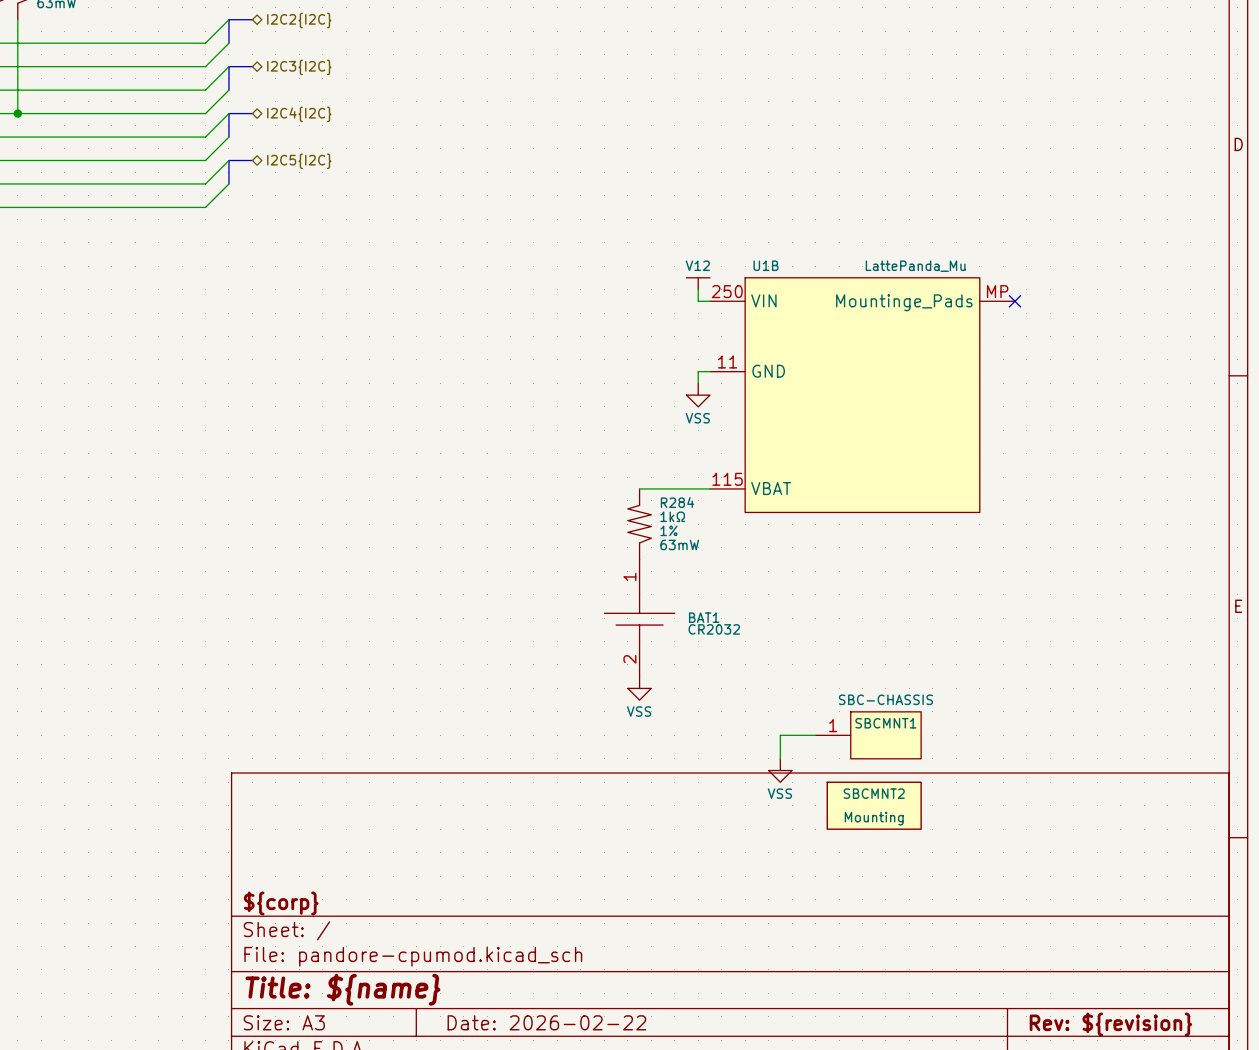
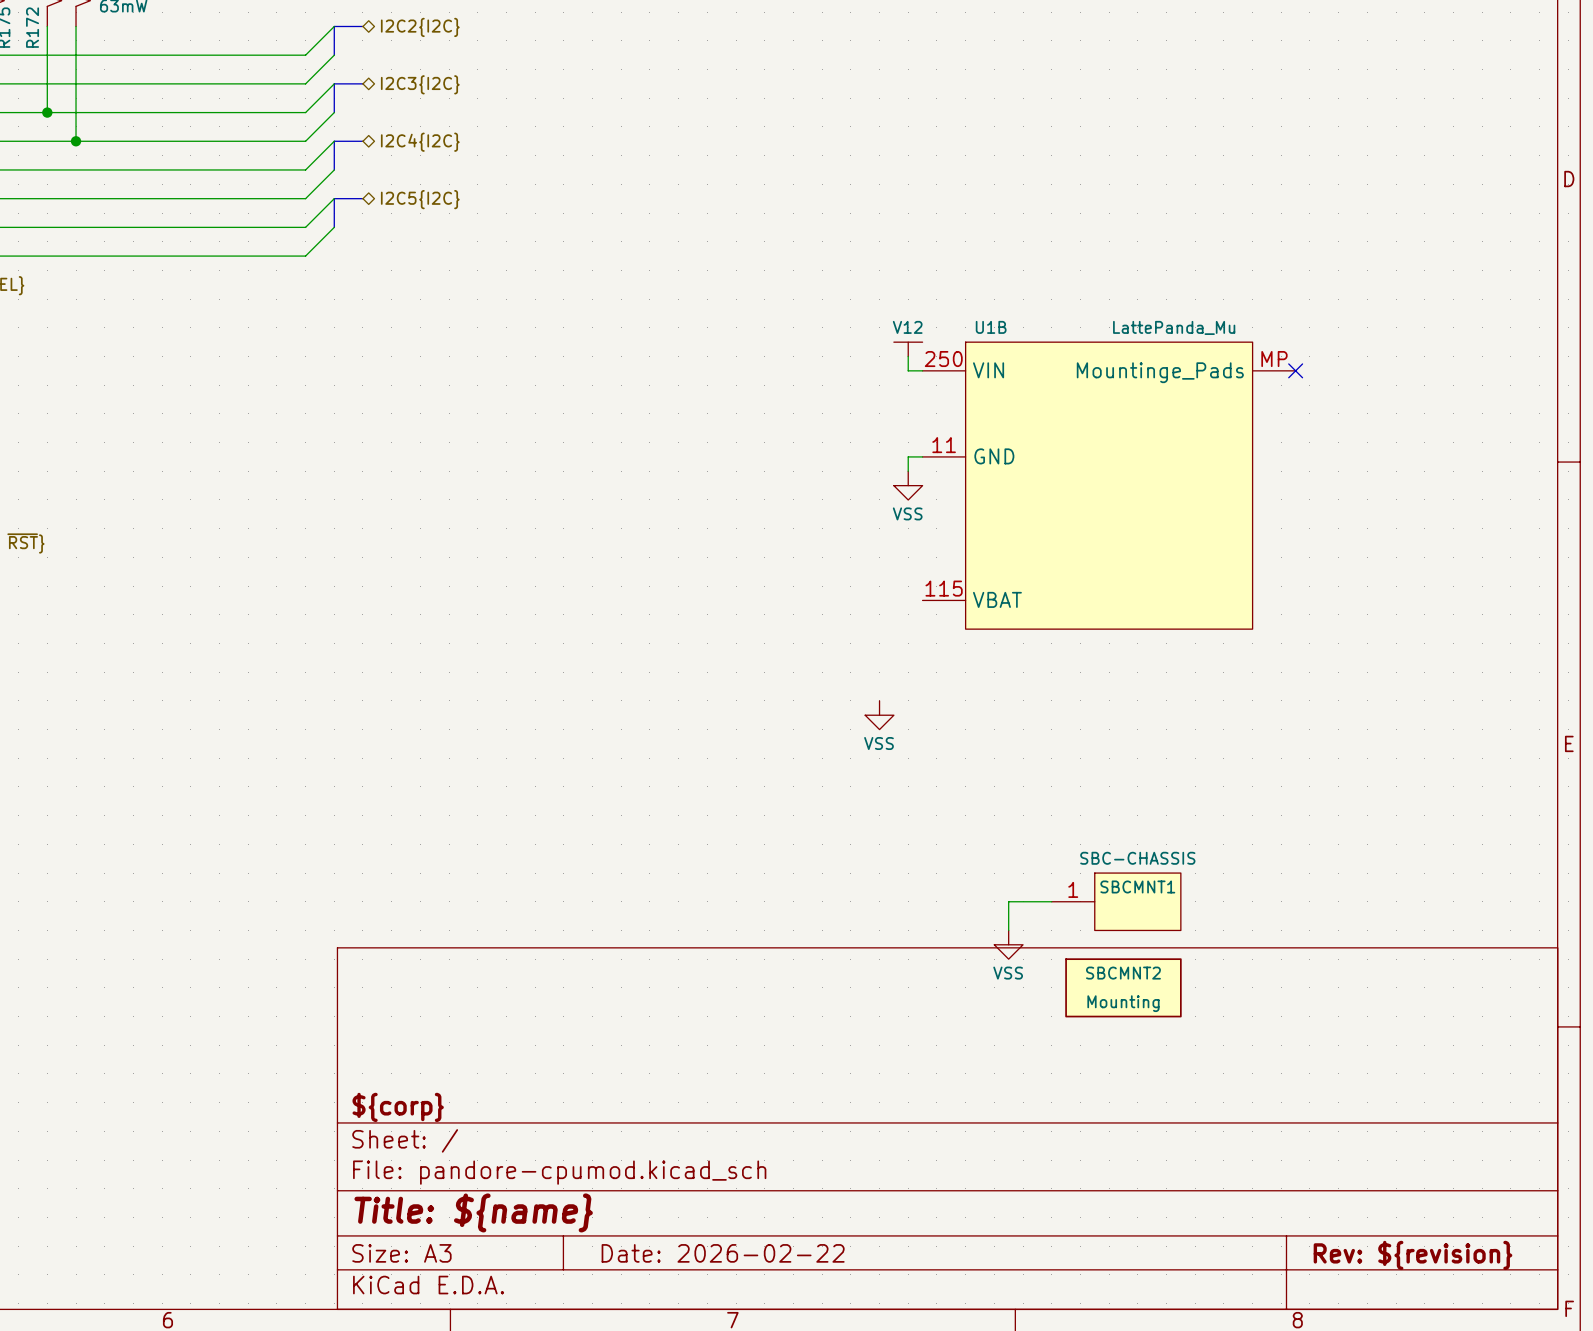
wire: (639, 488) (709, 488) -> none
R284: (639, 524) -> none
BAT1: CR2032 (639, 618) -> none
power symbol position: VSS (639, 688) -> VSS (879, 715)

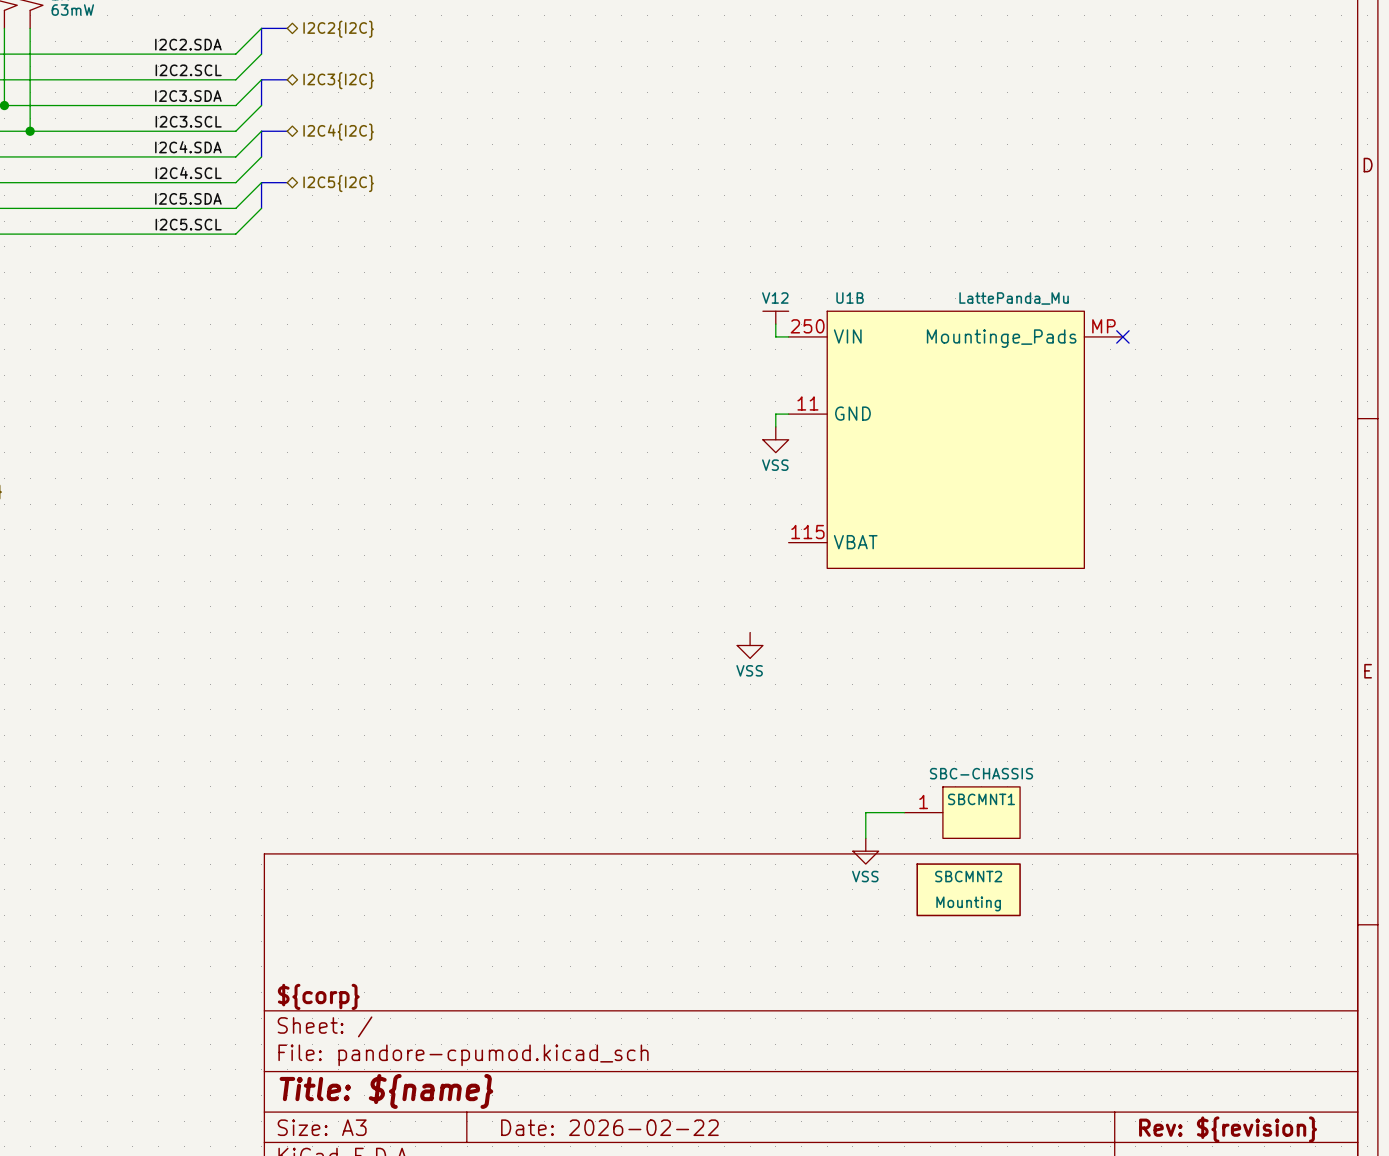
label: none -> I2C2.SDA (188, 44)
label: none -> I2C2.SCL (188, 70)
label: none -> I2C3.SDA (188, 96)
label: none -> I2C3.SCL (188, 121)
label: none -> I2C4.SDA (188, 147)
label: none -> I2C4.SCL (188, 172)
label: none -> I2C5.SDA (188, 198)
label: none -> I2C5.SCL (188, 224)

